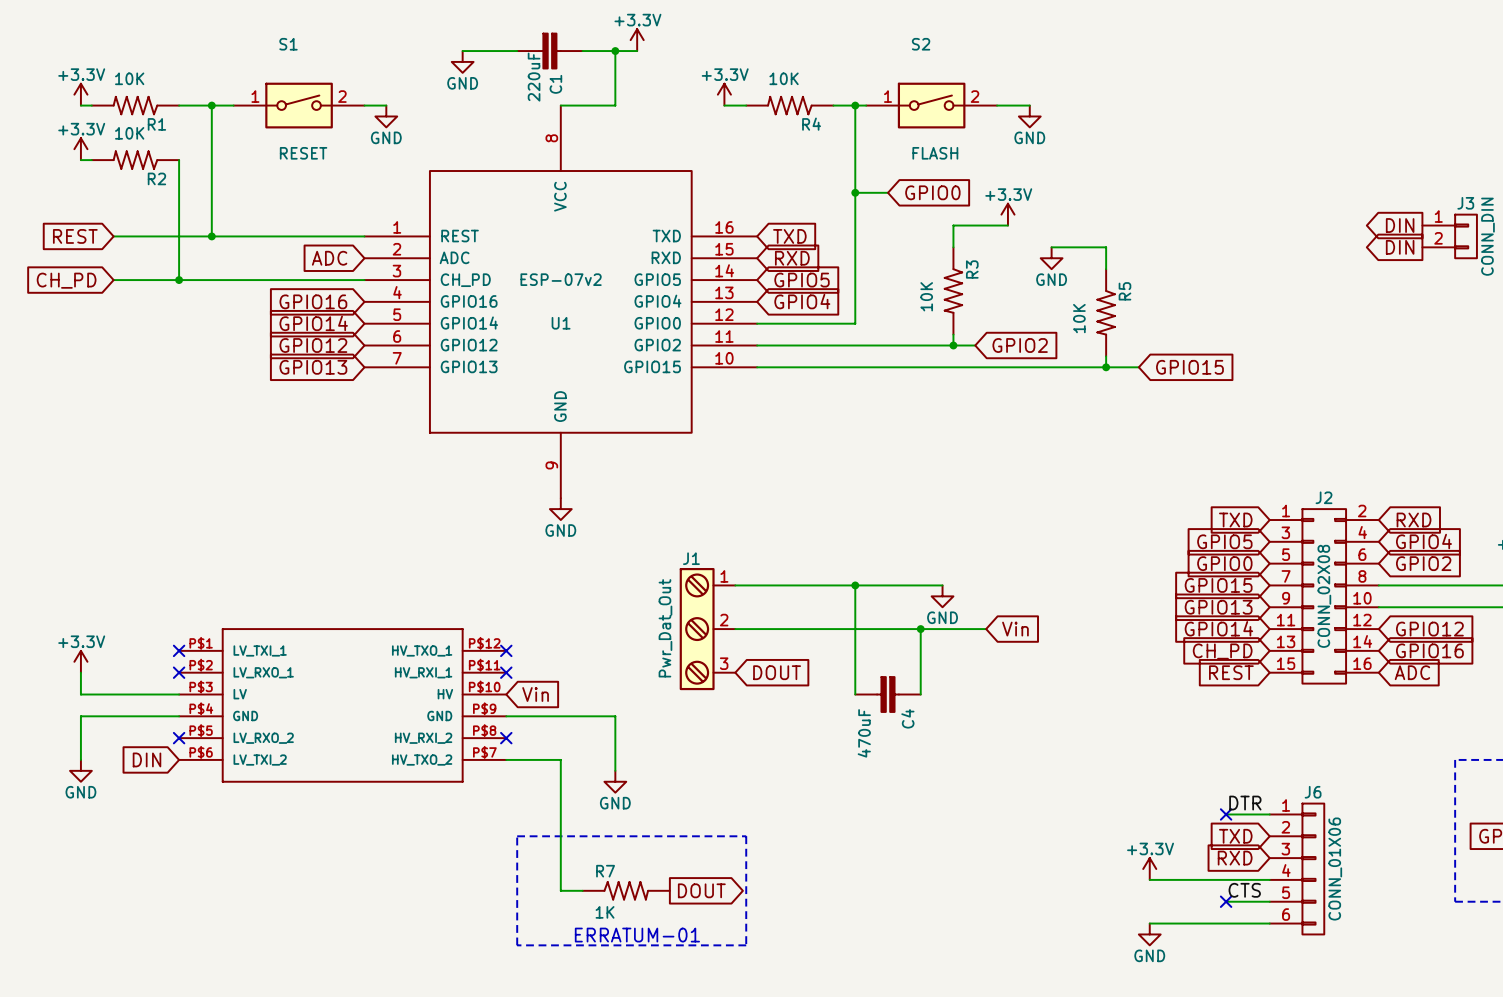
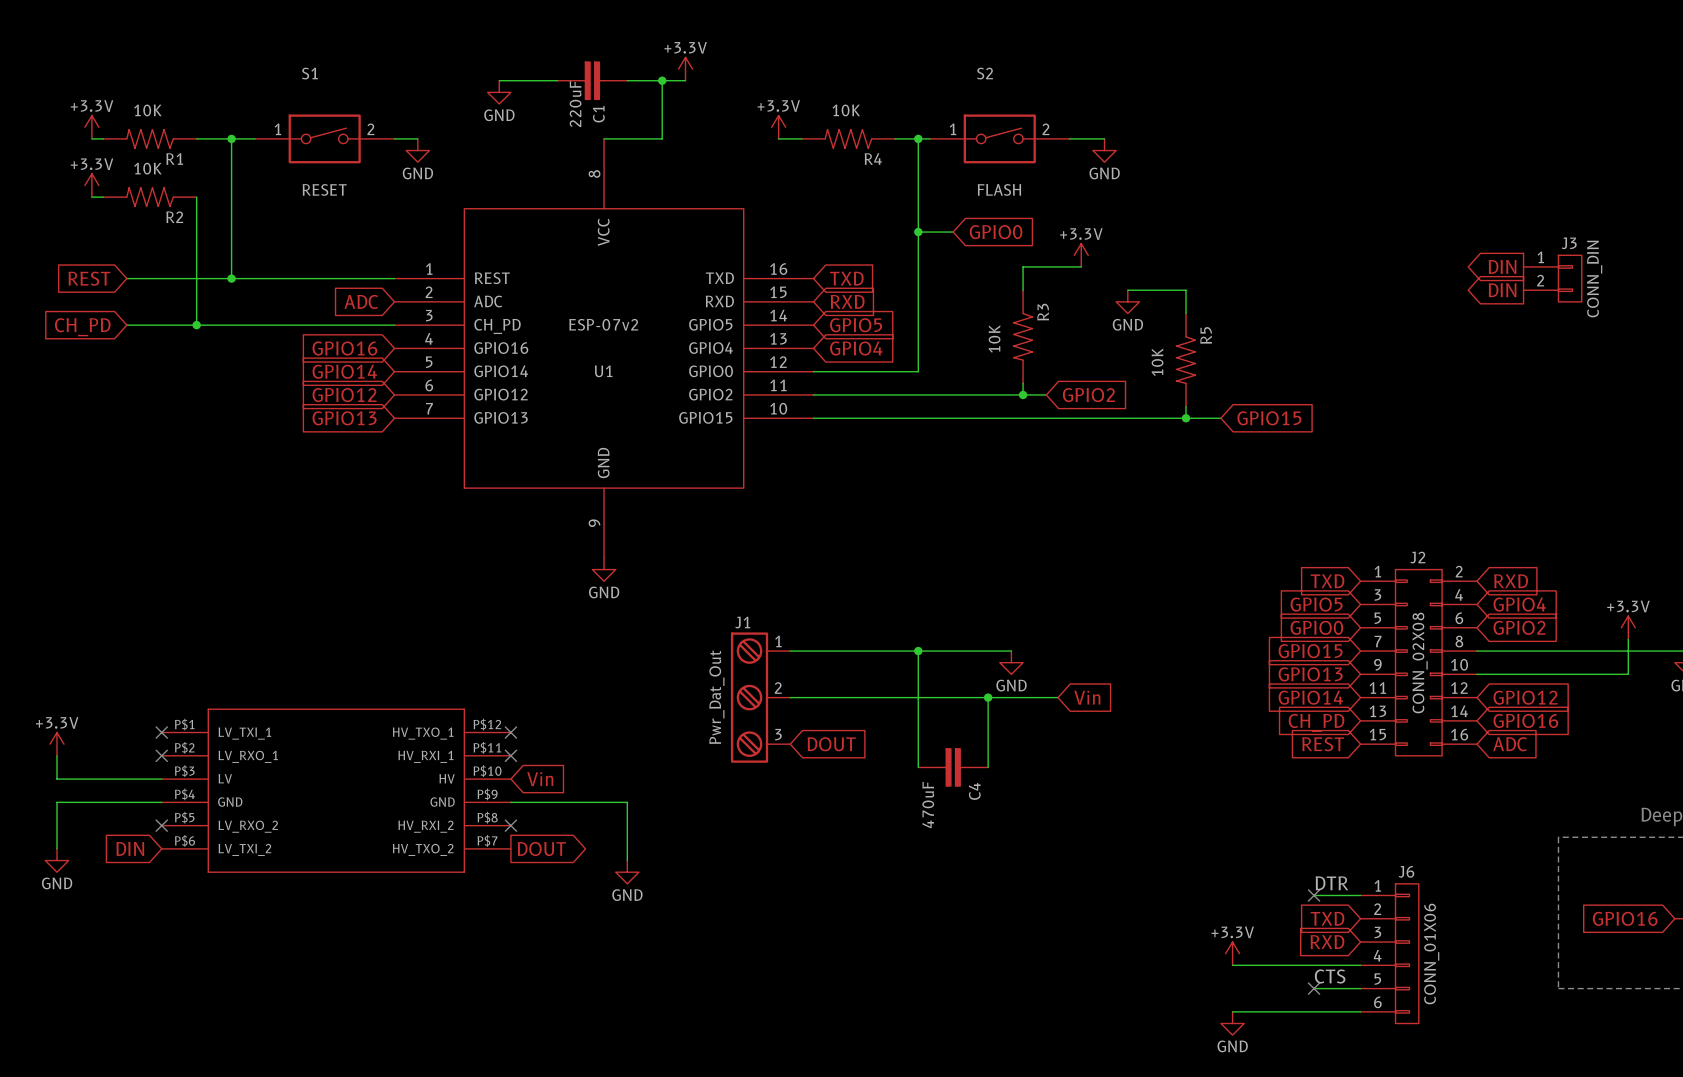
no-connect mark: (179, 650) -> none
no-connect mark: (506, 650) -> none
power symbol position: +3.3V (80, 661) -> +3.3V (56, 744)
no-connect mark: none -> (161, 732)
no-connect mark: none -> (510, 732)
wire: (80, 672) (80, 694) (179, 694) -> (56, 755) (56, 779) (161, 779)
no-connect mark: (179, 672) -> none
no-connect mark: (506, 672) -> none
no-connect mark: none -> (161, 755)
no-connect mark: none -> (510, 755)
global label position: Vin (535, 694) -> Vin (540, 779)
part position: (342, 705) -> (336, 790)
wire: (179, 716) (80, 716) (80, 759) -> (161, 802) (56, 802) (56, 848)
wire: (506, 716) (615, 716) (615, 770) -> (510, 802) (627, 802) (627, 860)
no-connect mark: (179, 738) -> none
no-connect mark: (506, 738) -> none
no-connect mark: none -> (161, 825)
no-connect mark: none -> (510, 825)
global label position: DIN (146, 759) -> DIN (130, 848)
wire: (506, 759) (560, 759) (560, 890) (582, 890) -> none
power symbol position: GND (80, 770) -> GND (56, 860)
global label: none -> DOUT (541, 848)
power symbol position: GND (615, 781) -> GND (627, 872)
line: (517, 836) (746, 836) (746, 945) (517, 945) (517, 836) -> none
R7: 1K (626, 890) -> none
global label: DOUT (701, 890) -> none
text: ERRATUM-01 (637, 935) -> none

